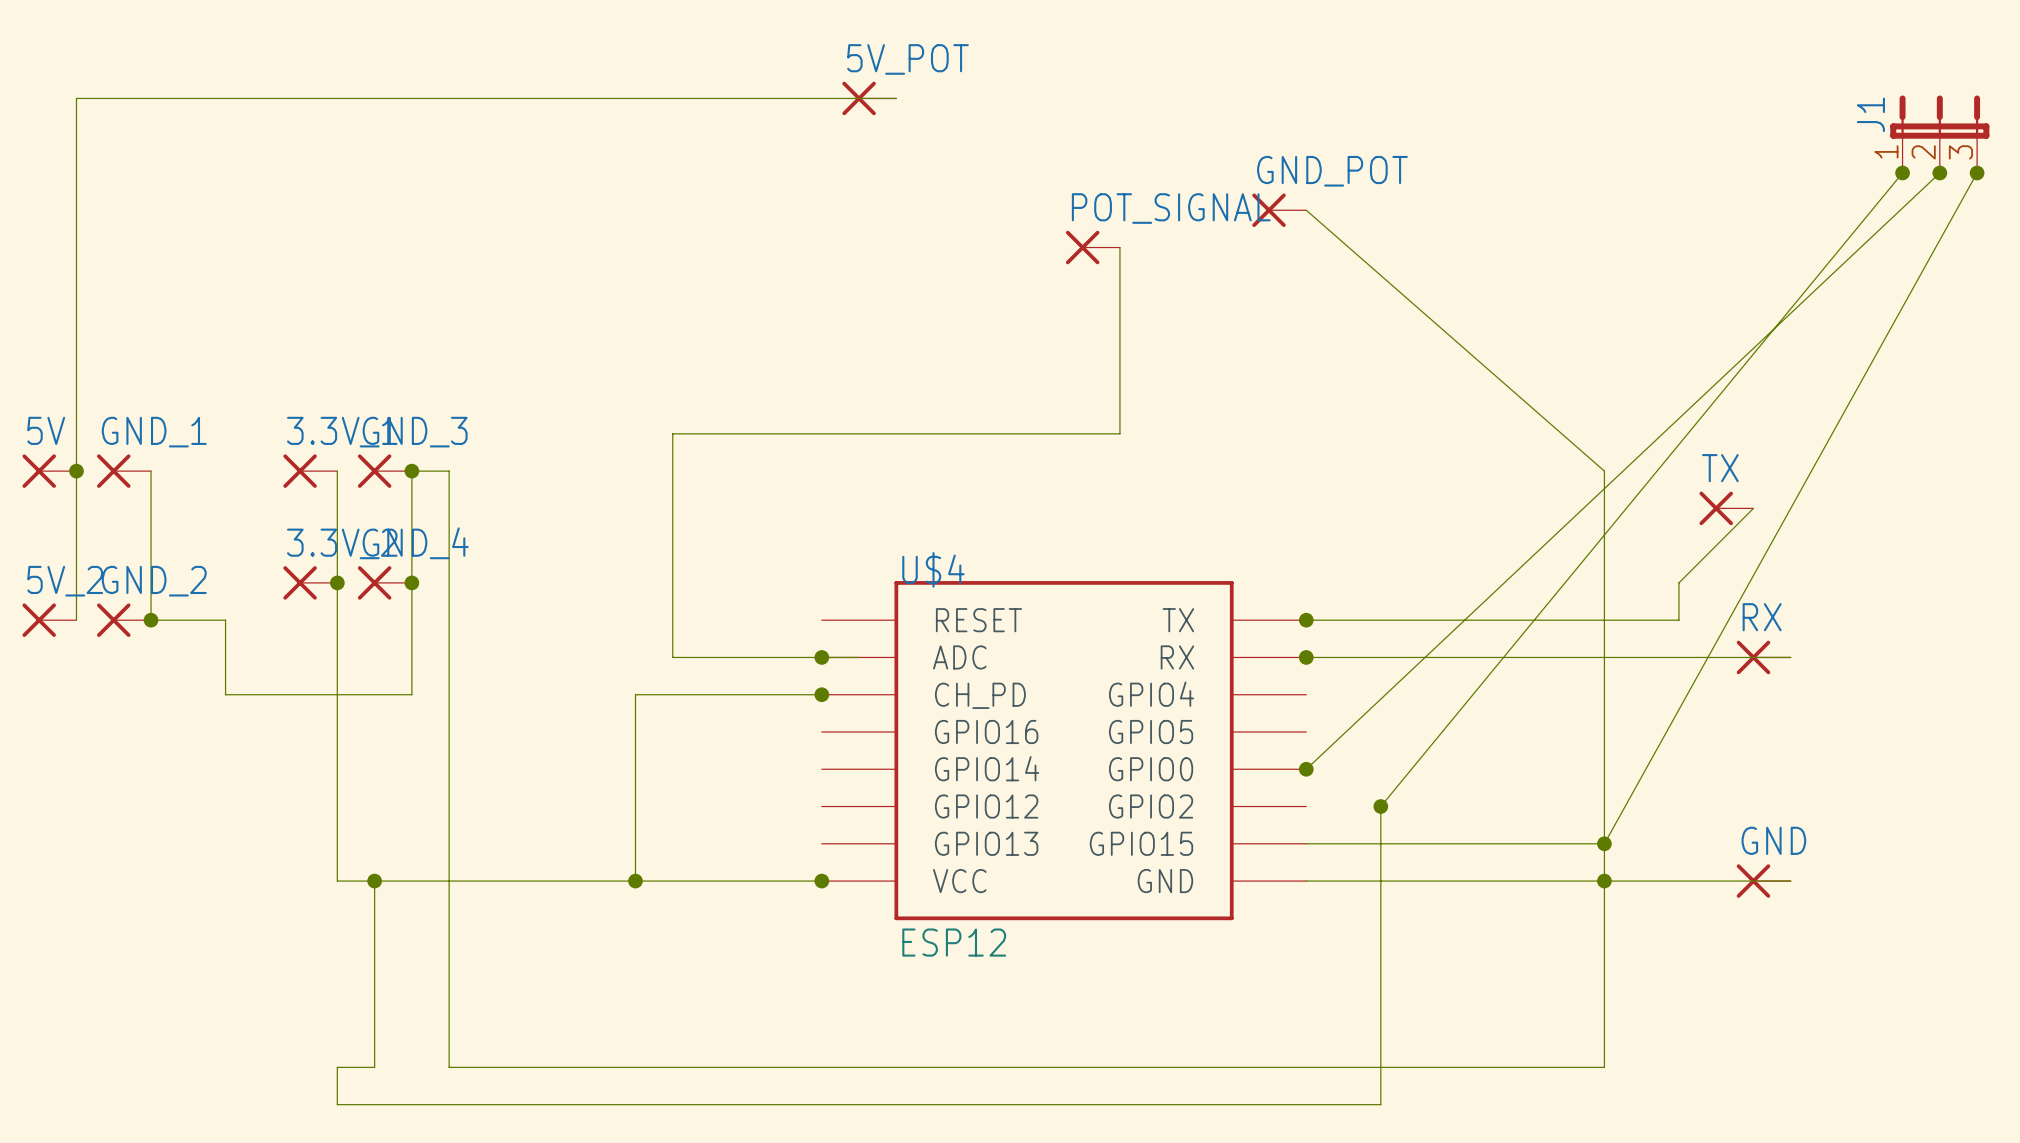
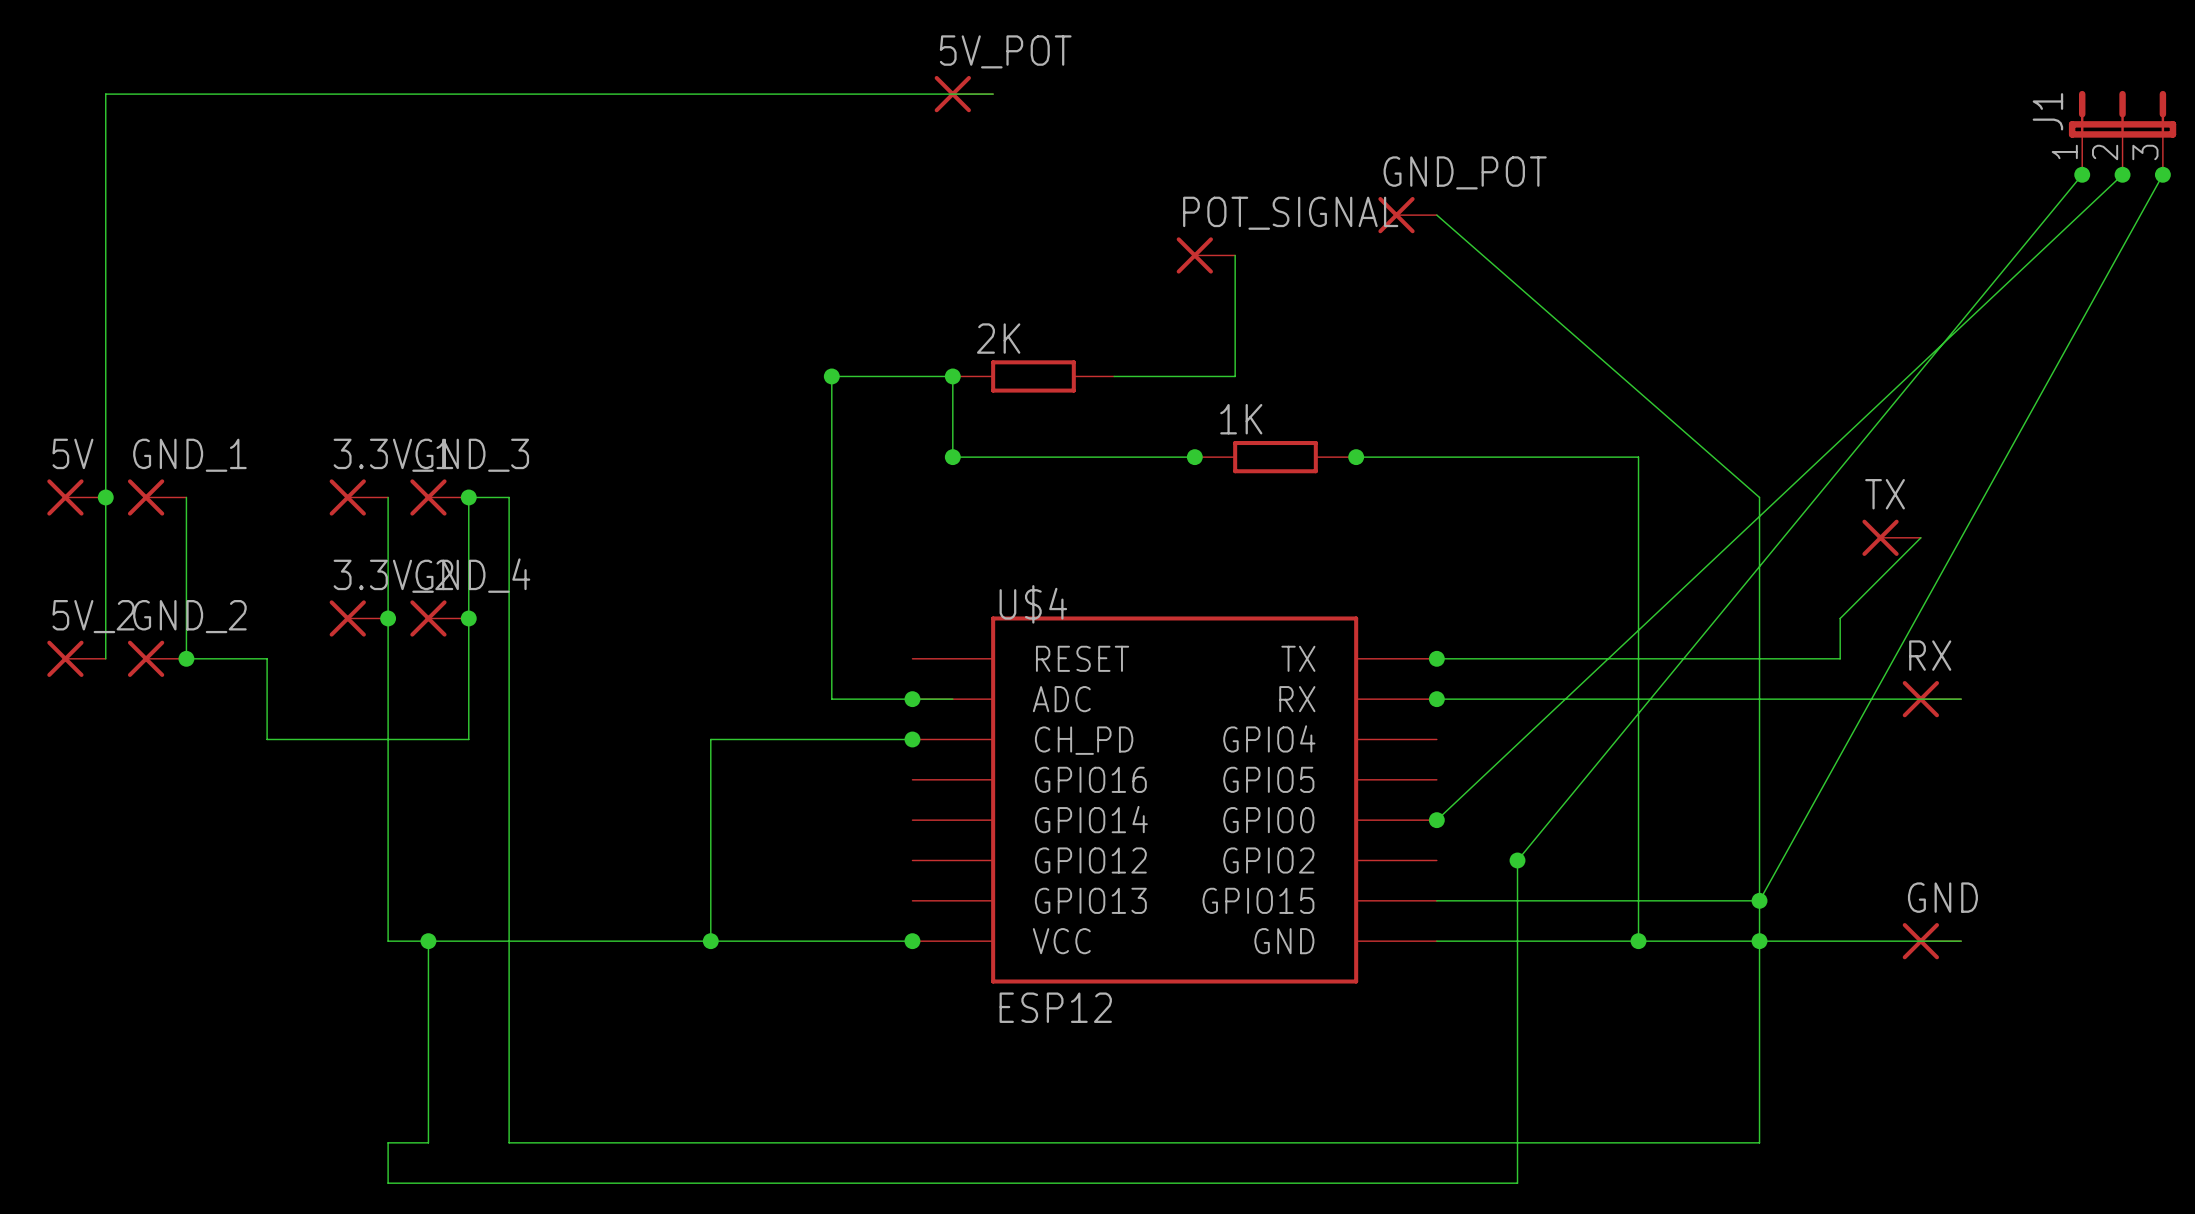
junction: none -> (831, 376)
junction: none -> (952, 376)
2K: none -> (1033, 376)
wire: (1119, 359) (1119, 433) (1082, 433) -> (1235, 376) (1114, 376)
wire: (859, 433) (672, 433) (672, 657) (747, 657) -> (952, 457) (952, 376) (831, 376) (831, 699)
junction: none -> (952, 457)
junction: none -> (1194, 457)
1K: none -> (1275, 457)
wire: none -> (1356, 457) (1638, 457) (1638, 941)
junction: none -> (1356, 457)
junction: none -> (1638, 941)

